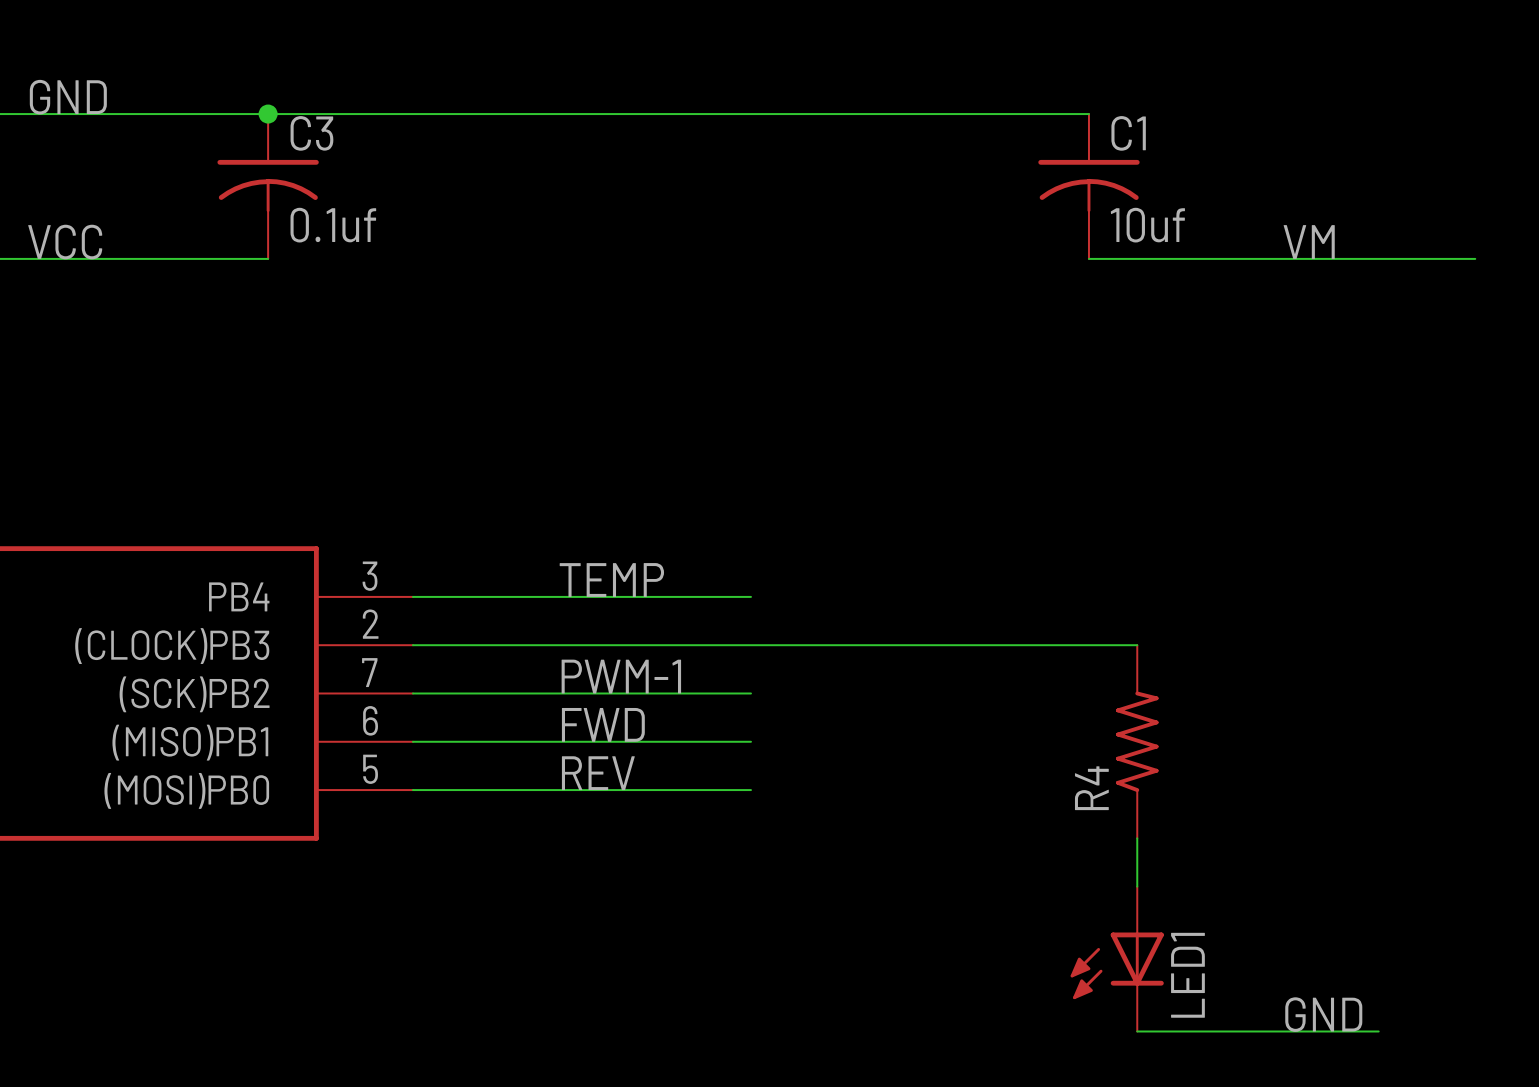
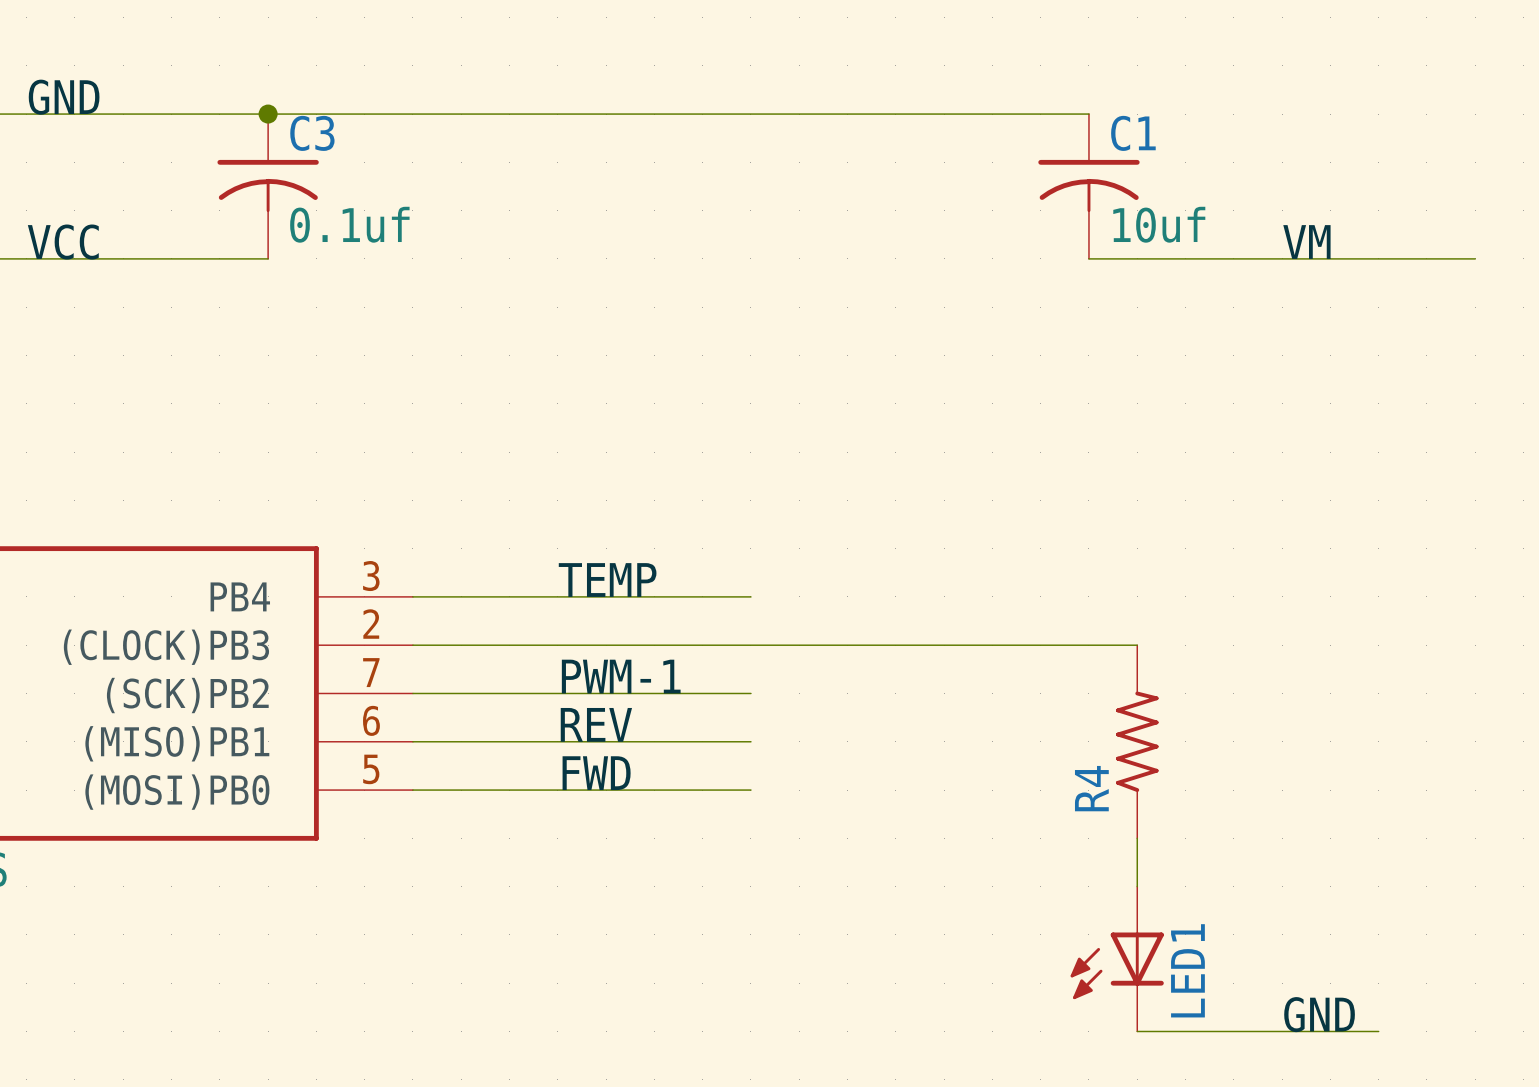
label: FWD (603, 724) -> REV (596, 724)
label: REV (598, 773) -> FWD (596, 773)

